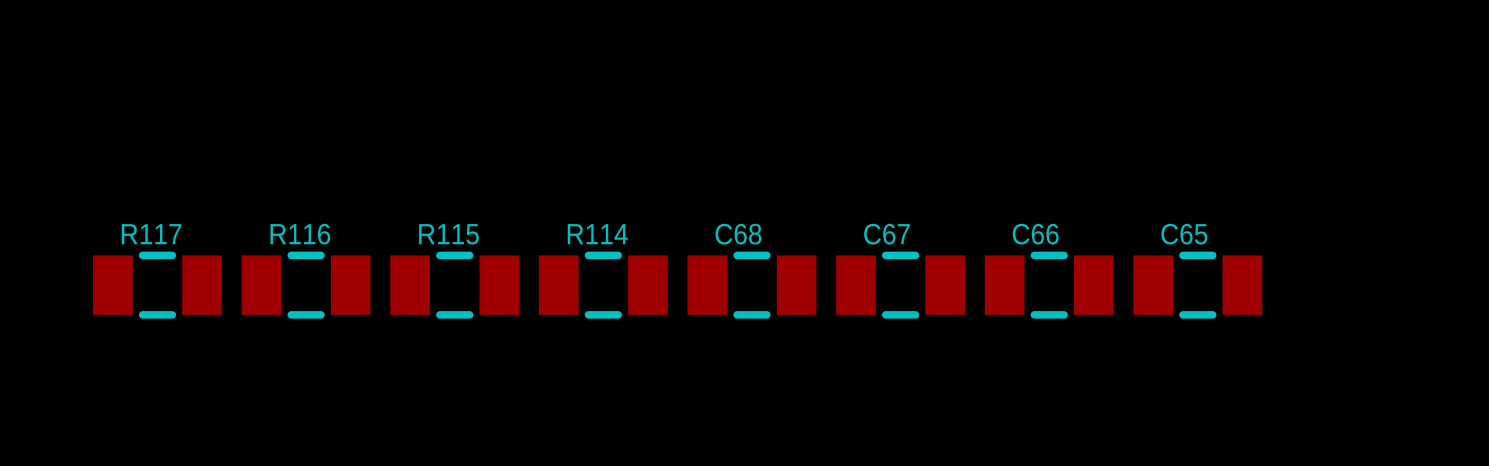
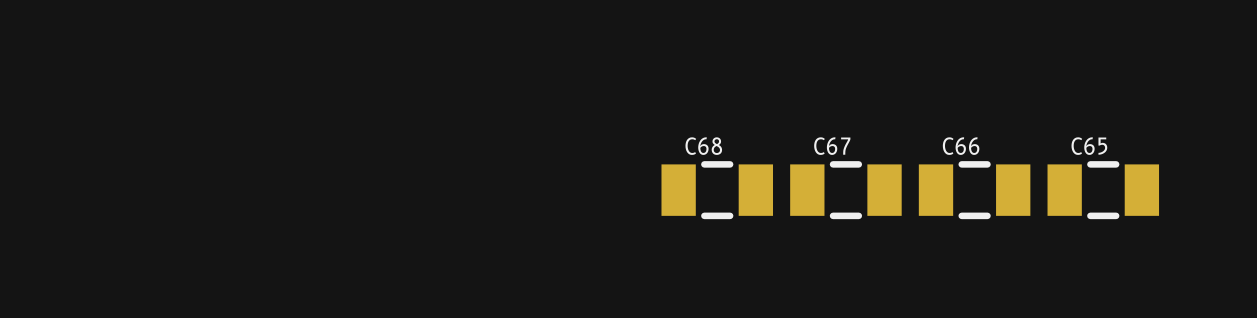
R117: (157, 285) -> none
R116: (306, 285) -> none
R115: (454, 285) -> none
R114: (603, 285) -> none

